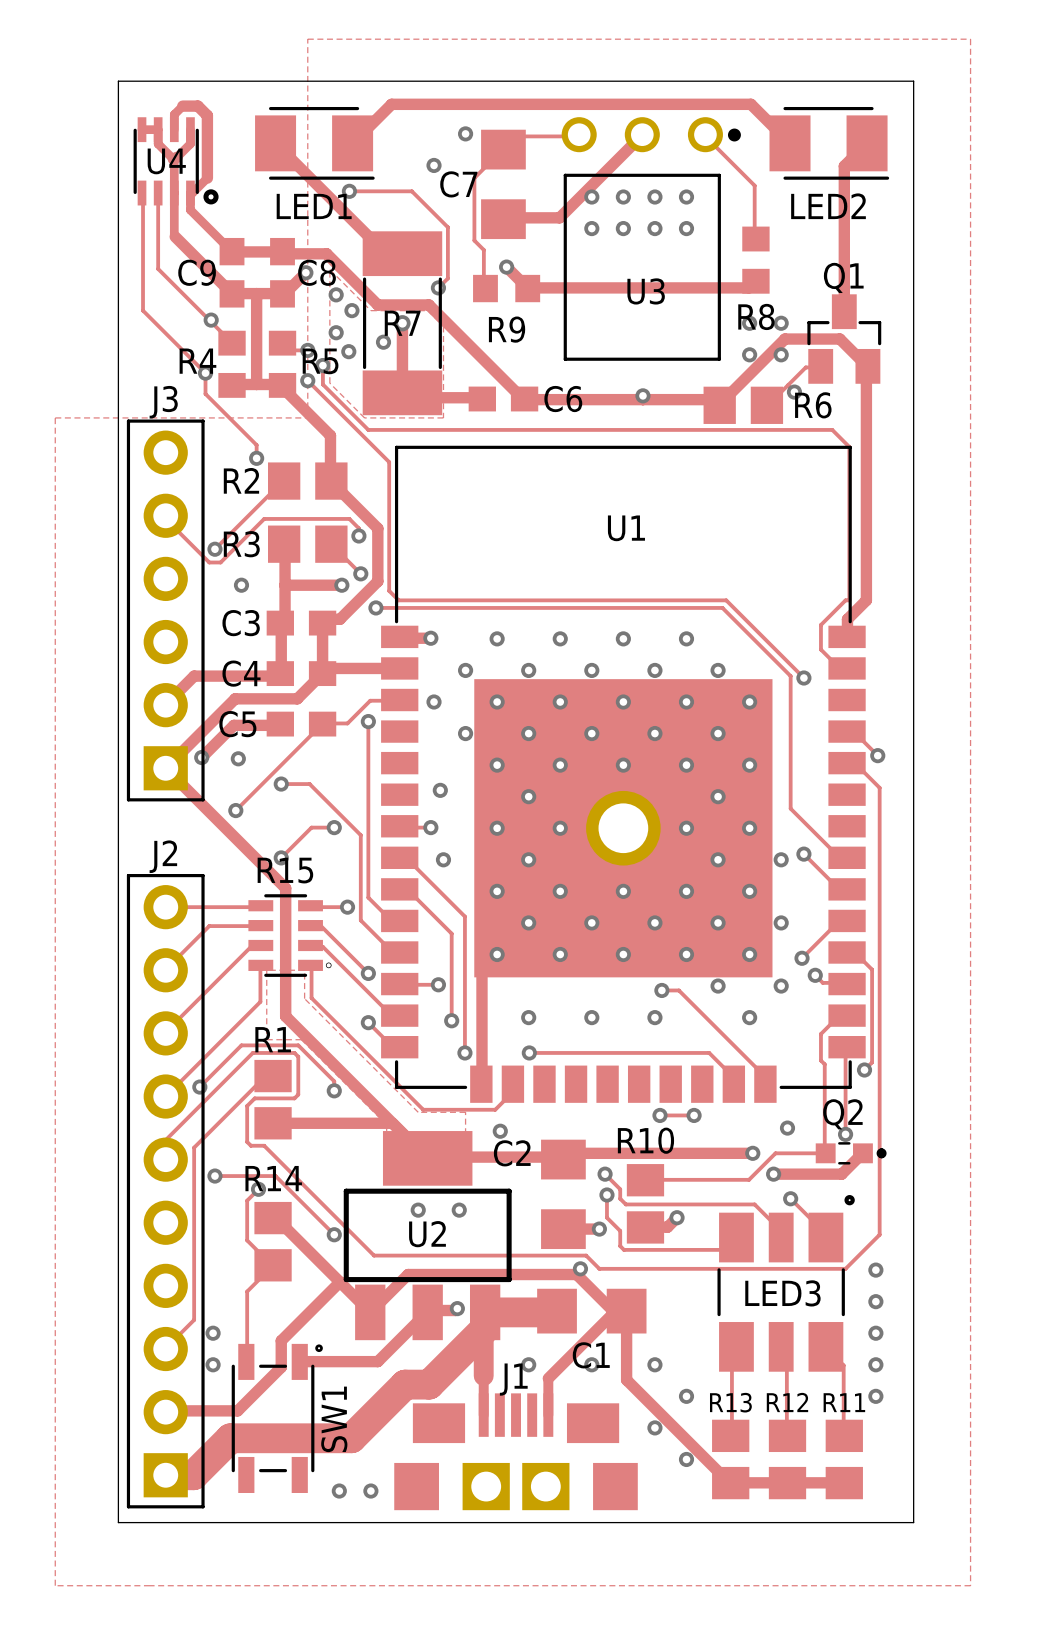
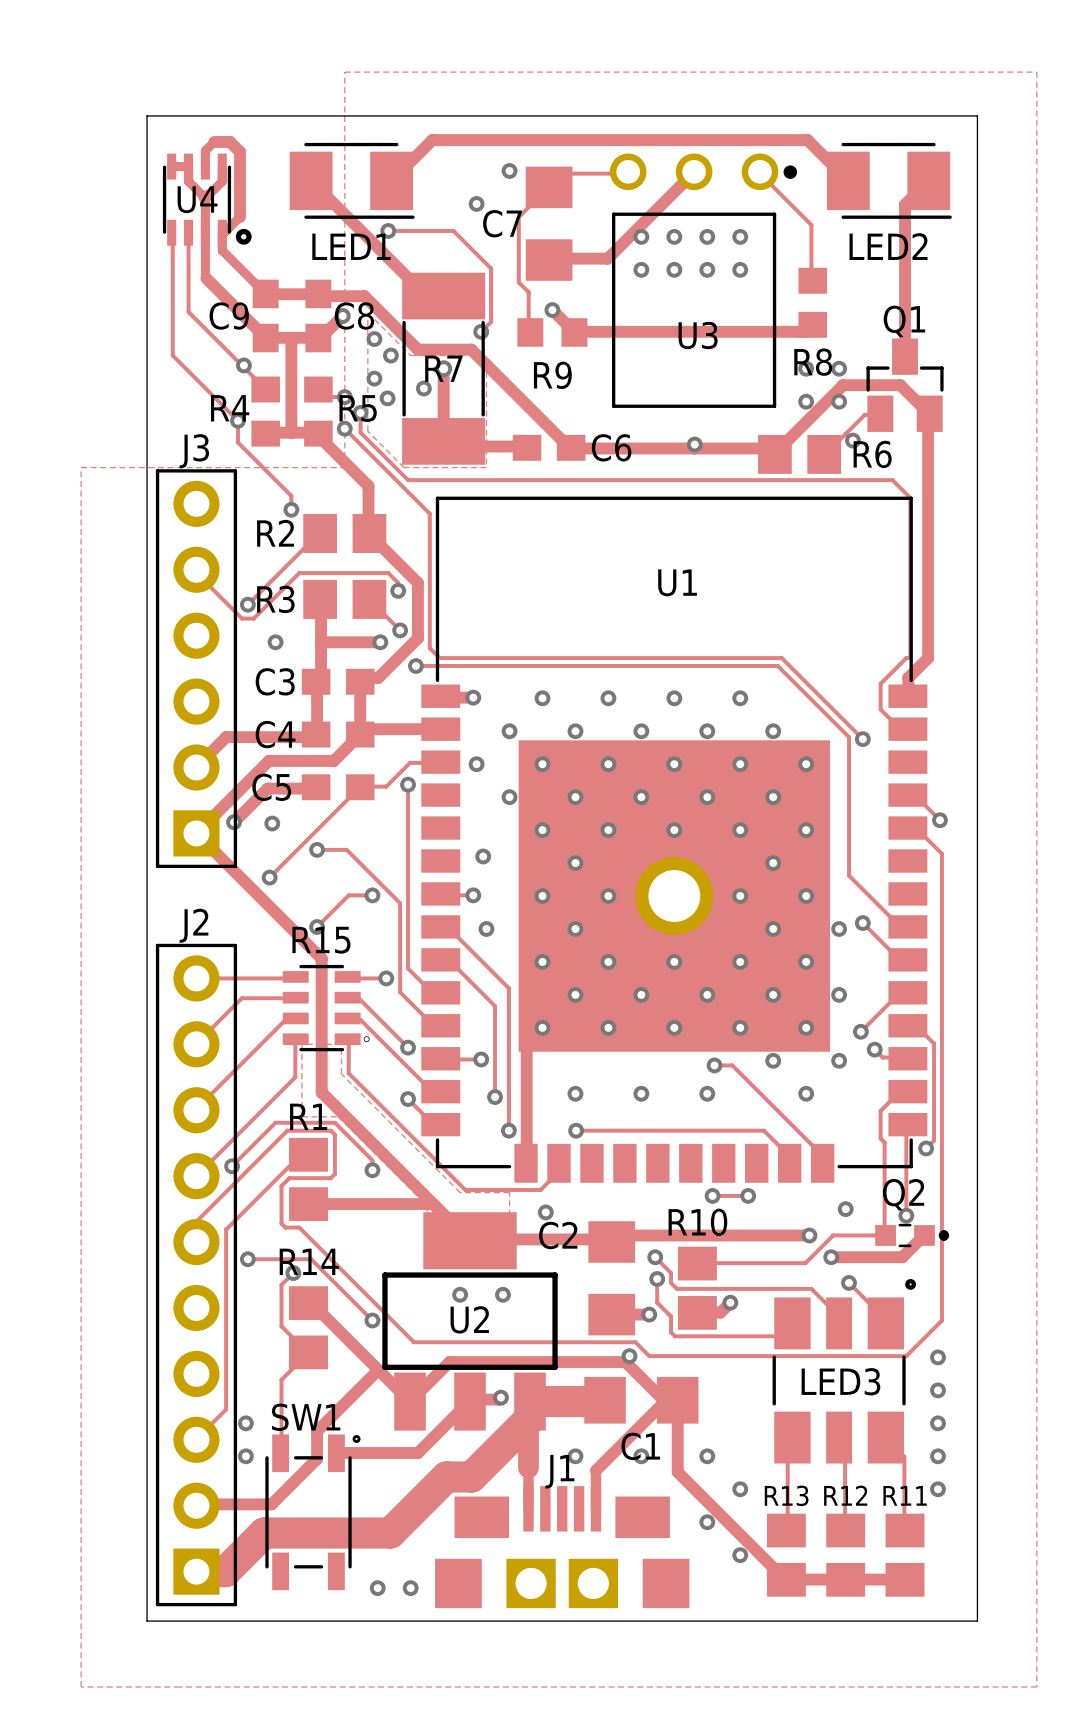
SW1 name rotation: 0° (334, 1419) -> 90° clockwise (306, 1417)
SW1 name position: SW1 (334, 1419) -> SW1 (306, 1417)

